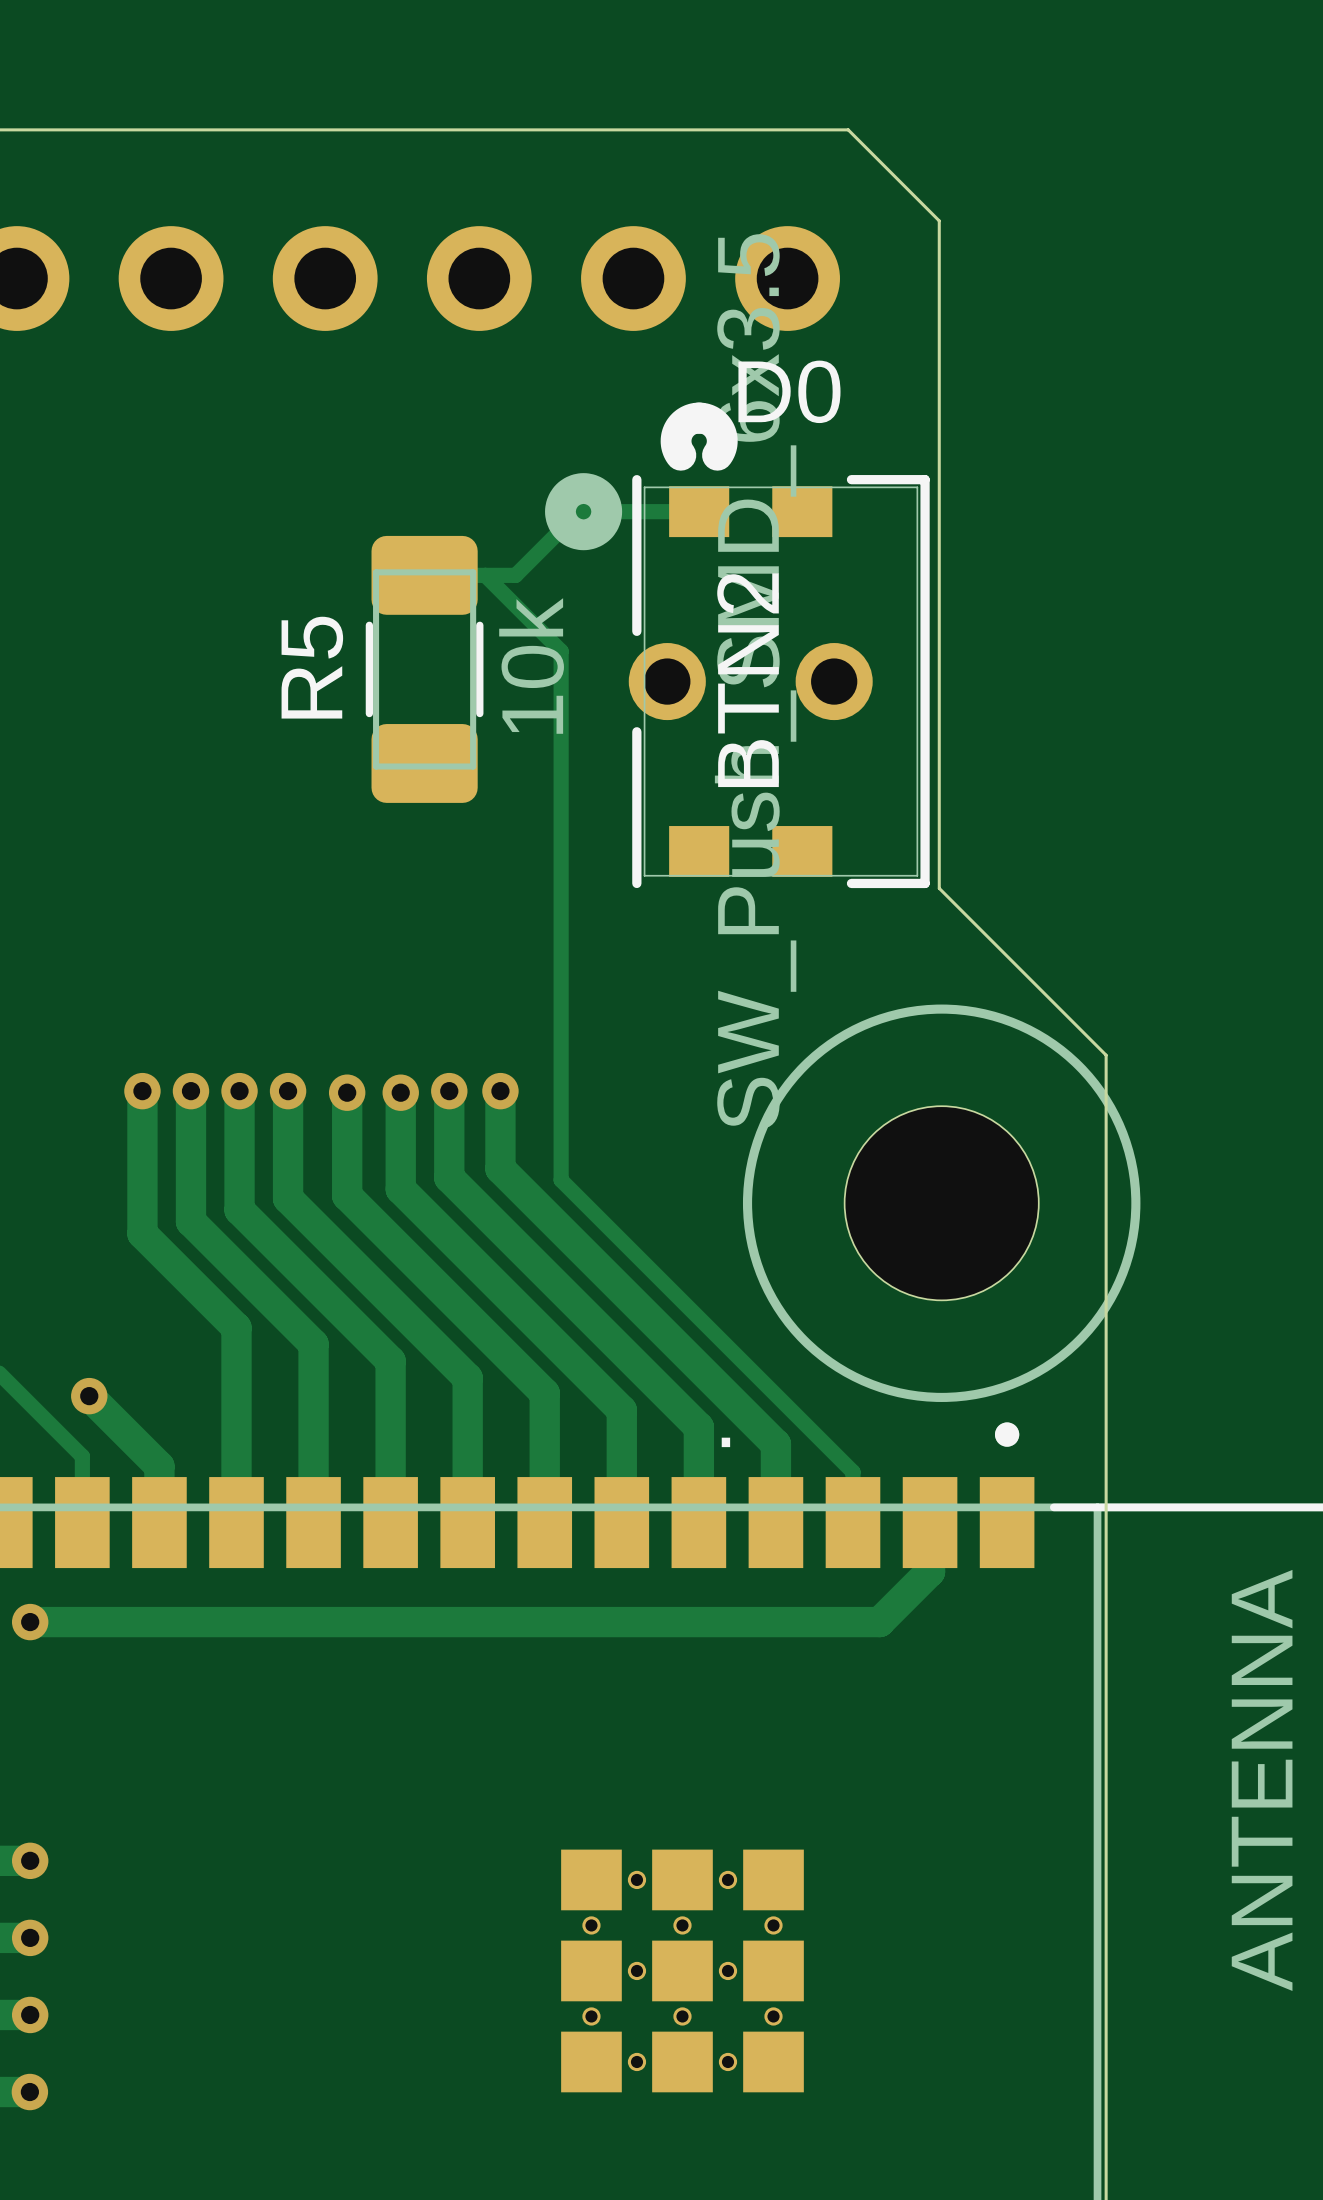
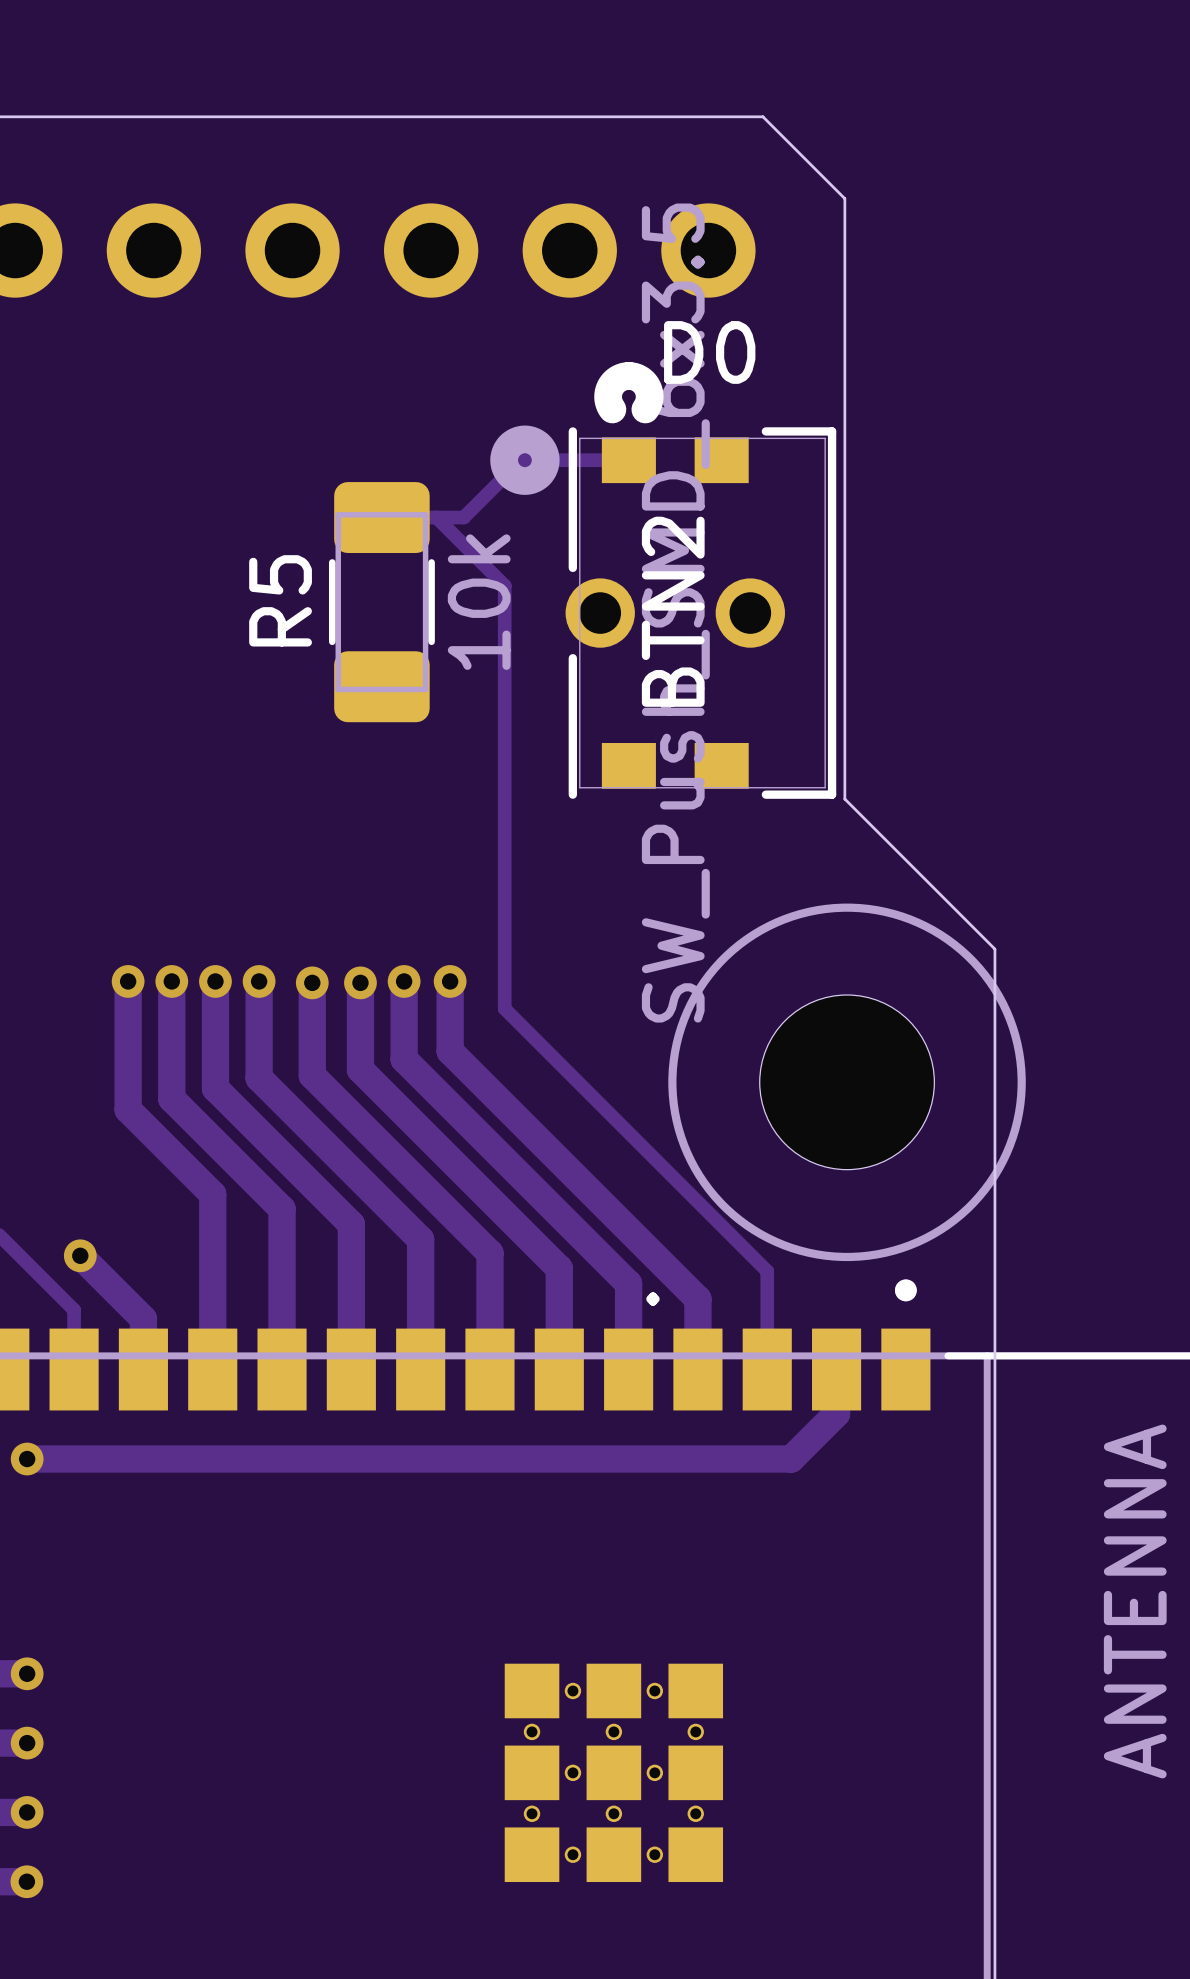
track: (561, 1121) (561, 1180) (852, 1472) -> (504, 1008) (767, 1271) (767, 1324)

